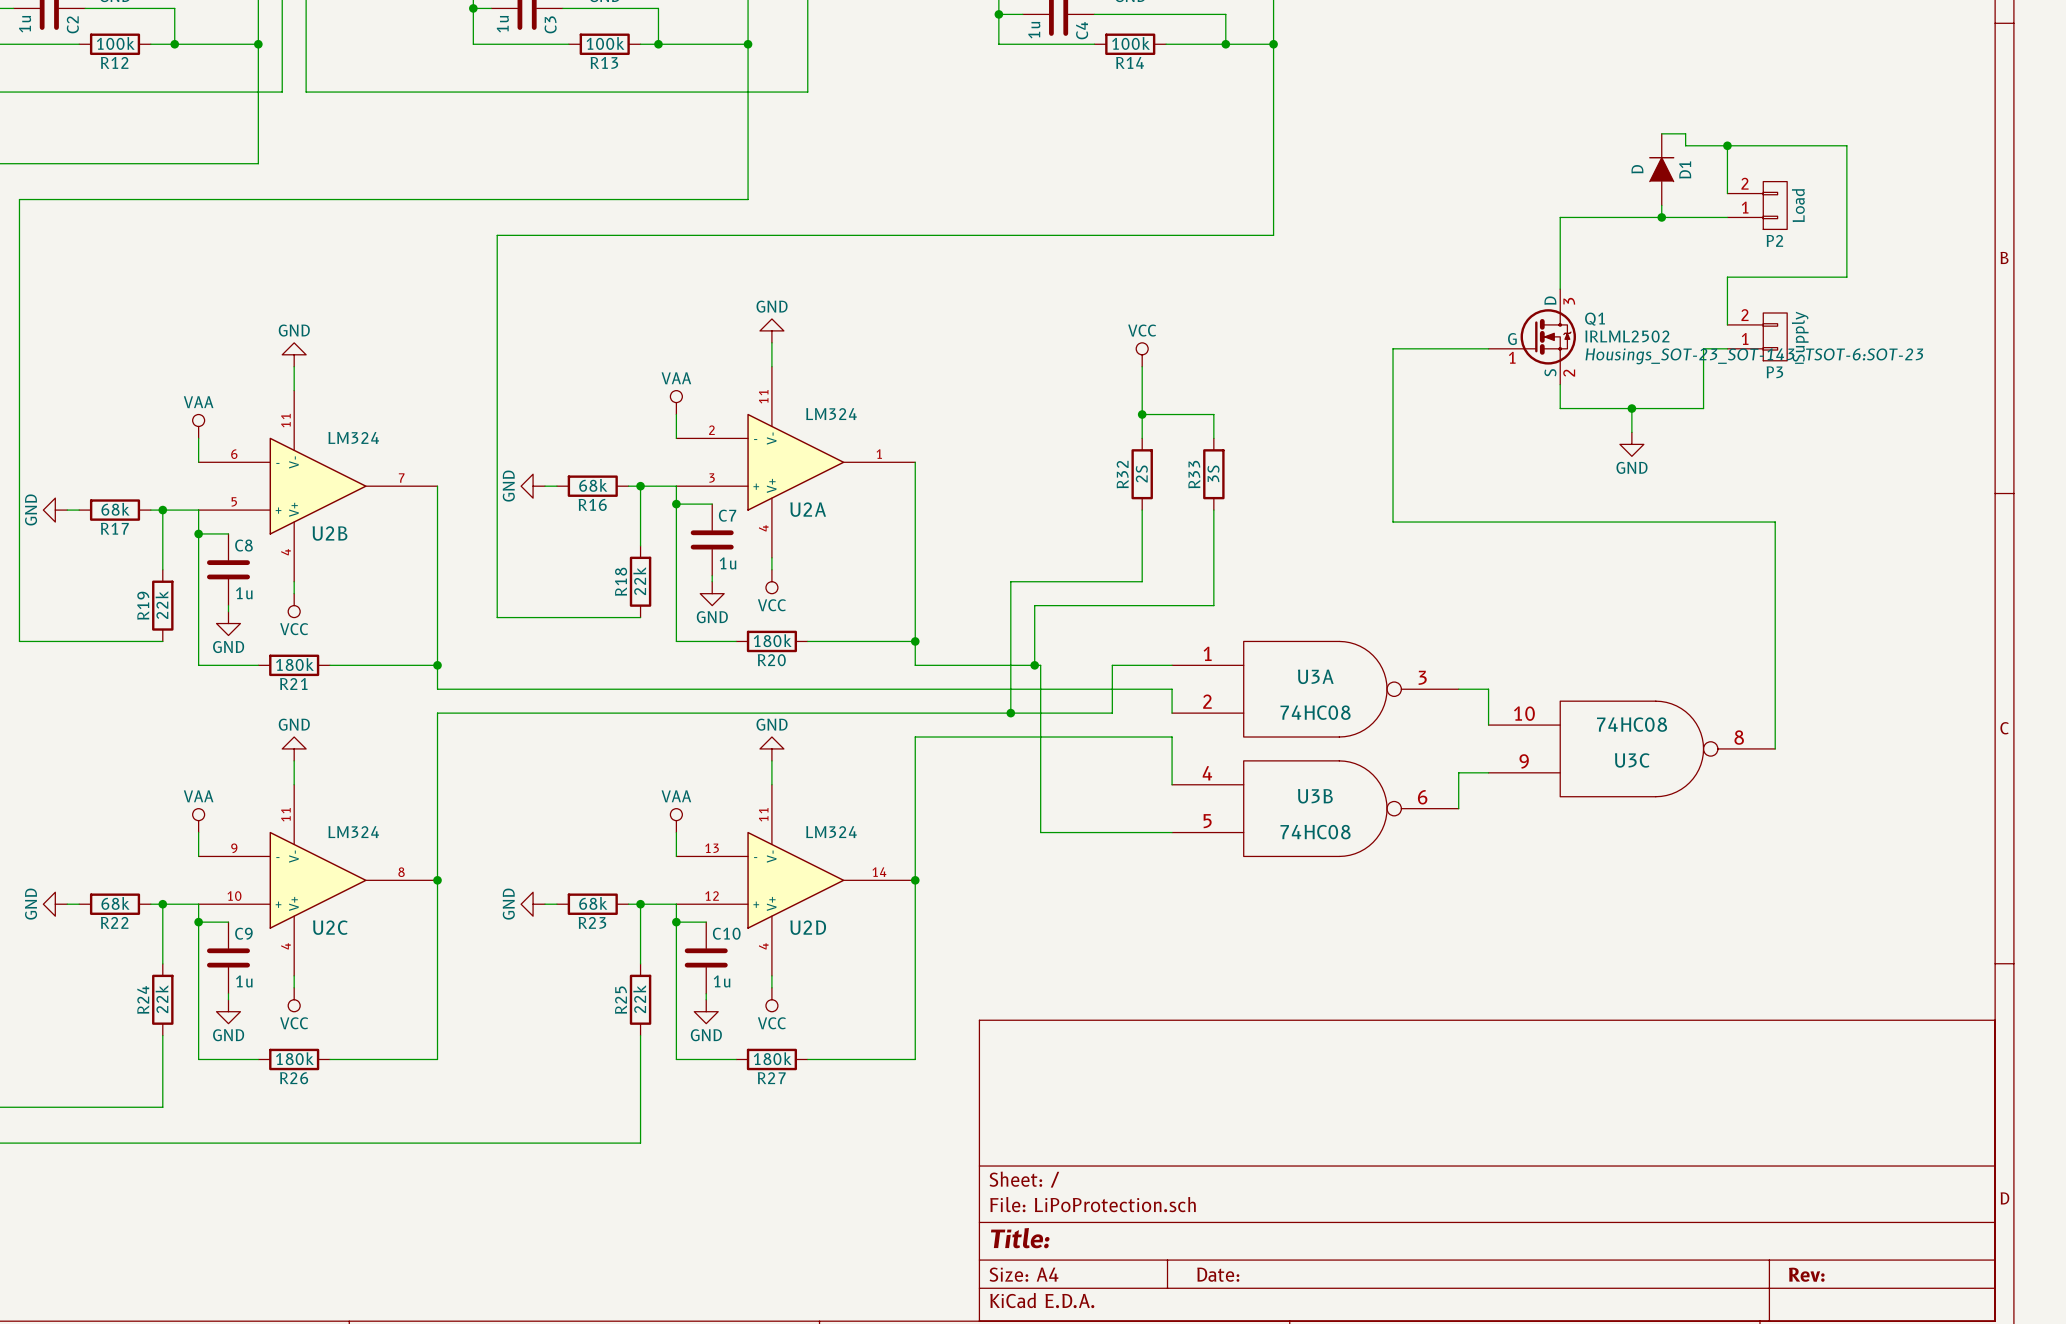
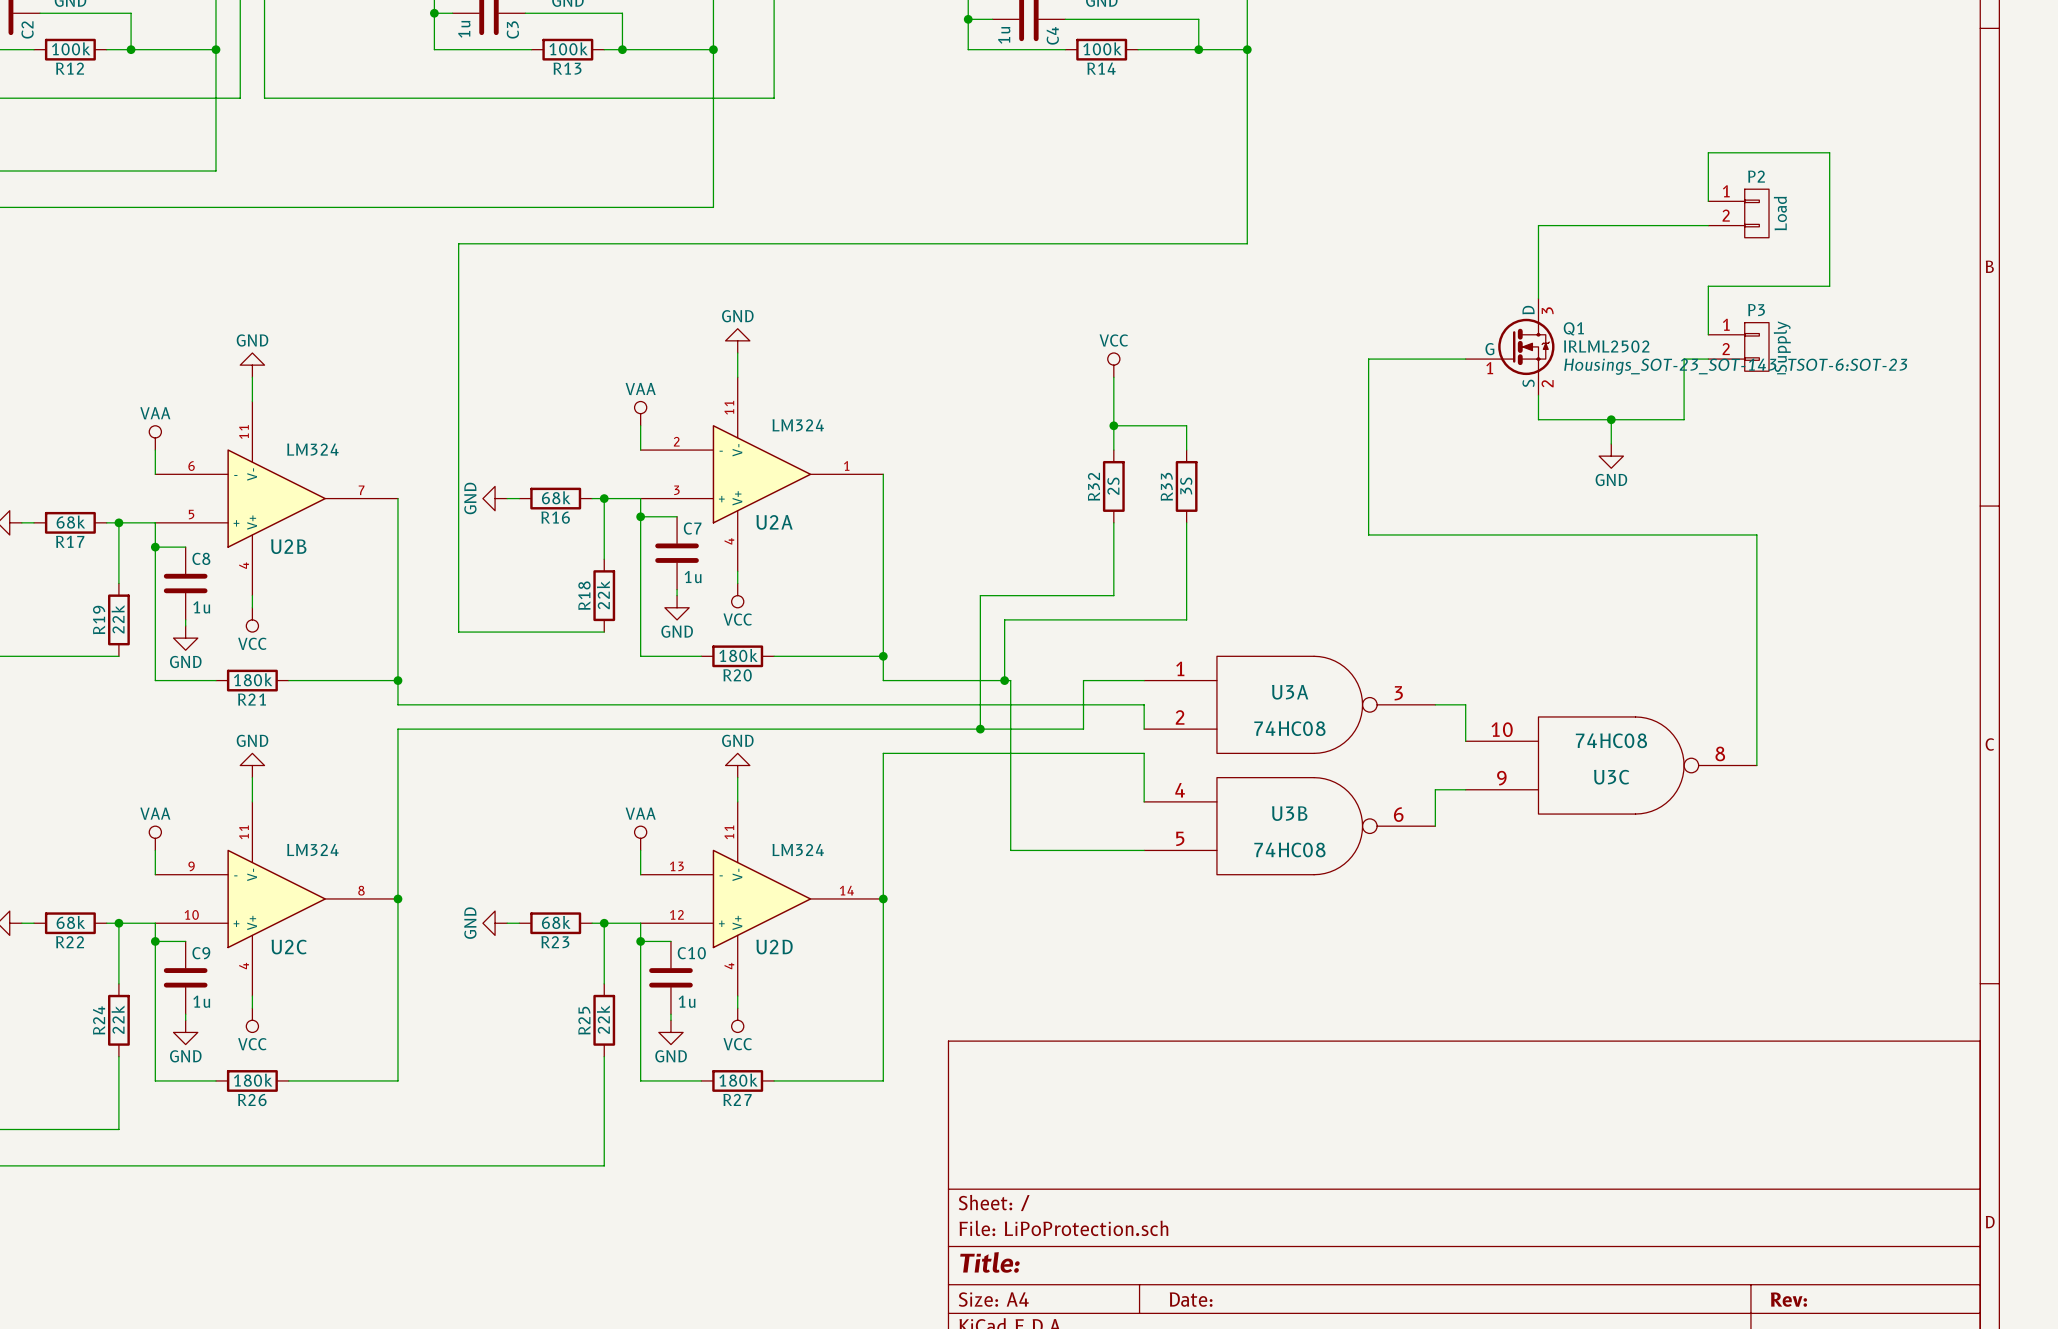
wire: (1661, 133) (1685, 133) (1685, 145) (1727, 145) -> none
junction: (1727, 145) -> none
D1: D (1661, 169) -> none
wire: (1661, 205) (1661, 217) -> none
P2 flip: as is (1775, 205) -> up-down (1756, 213)
junction: (1661, 217) -> none
P3 flip: as is (1775, 336) -> up-down (1756, 346)

